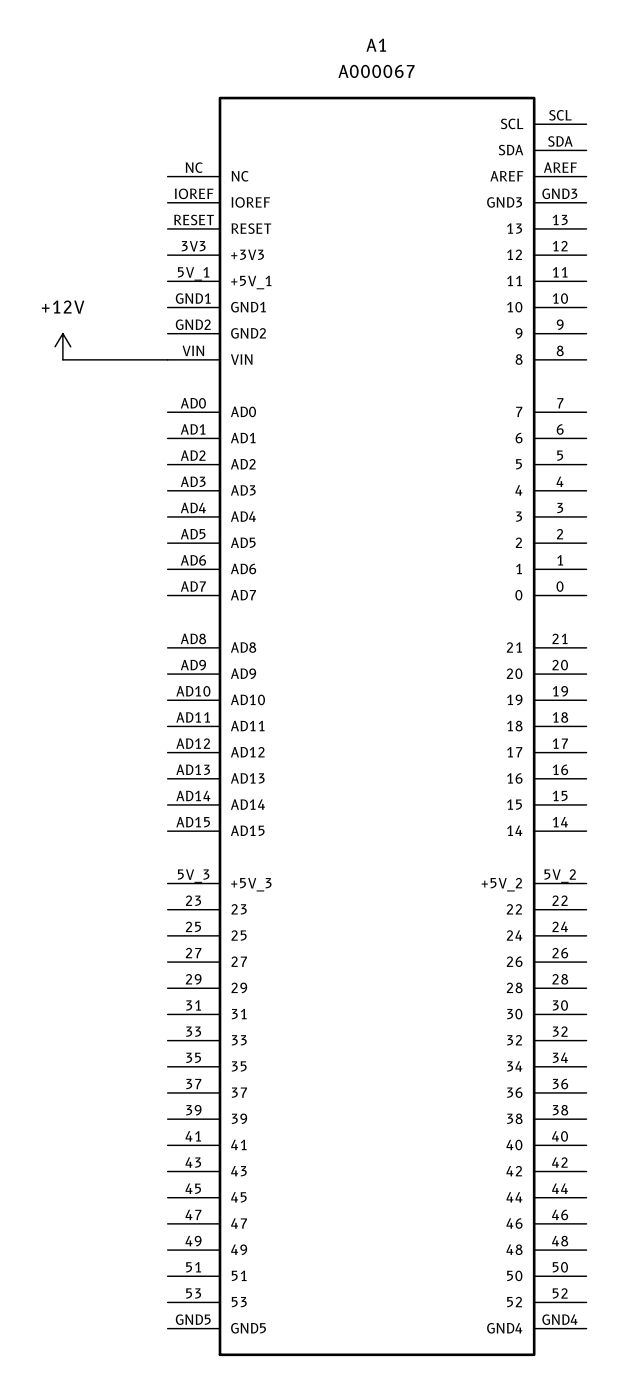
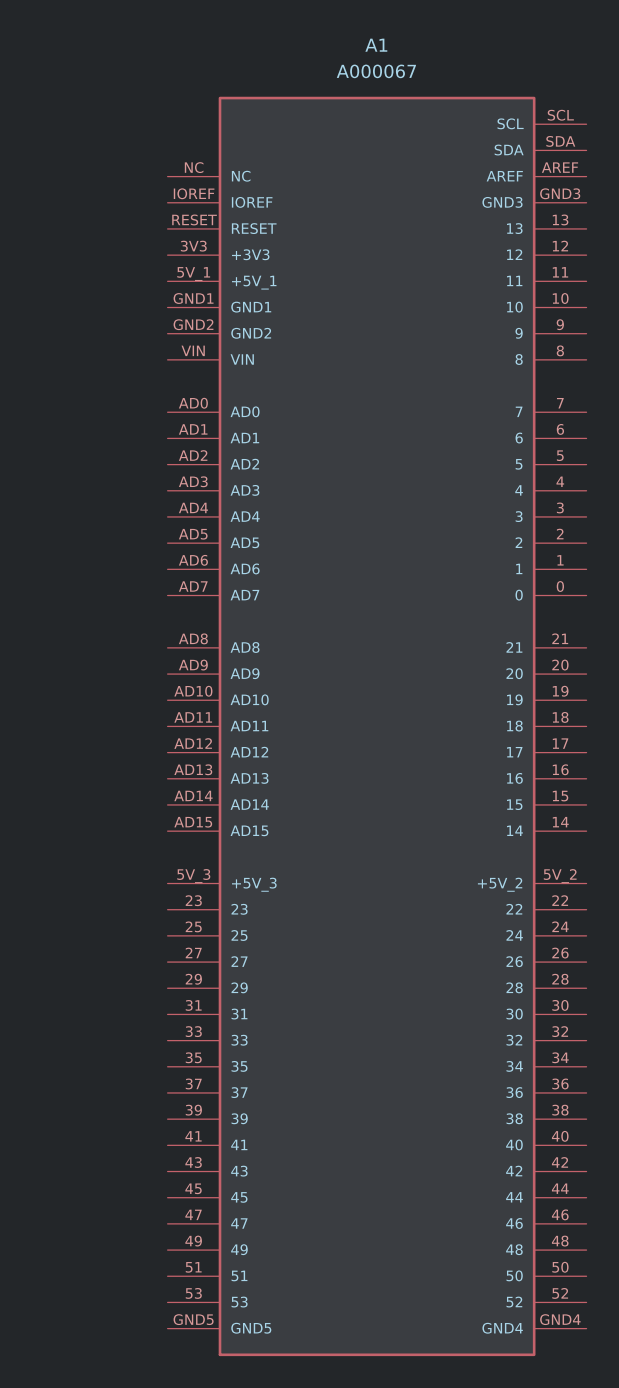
power symbol: +12V (62, 346) -> none
wire: (62, 359) (167, 359) -> none

